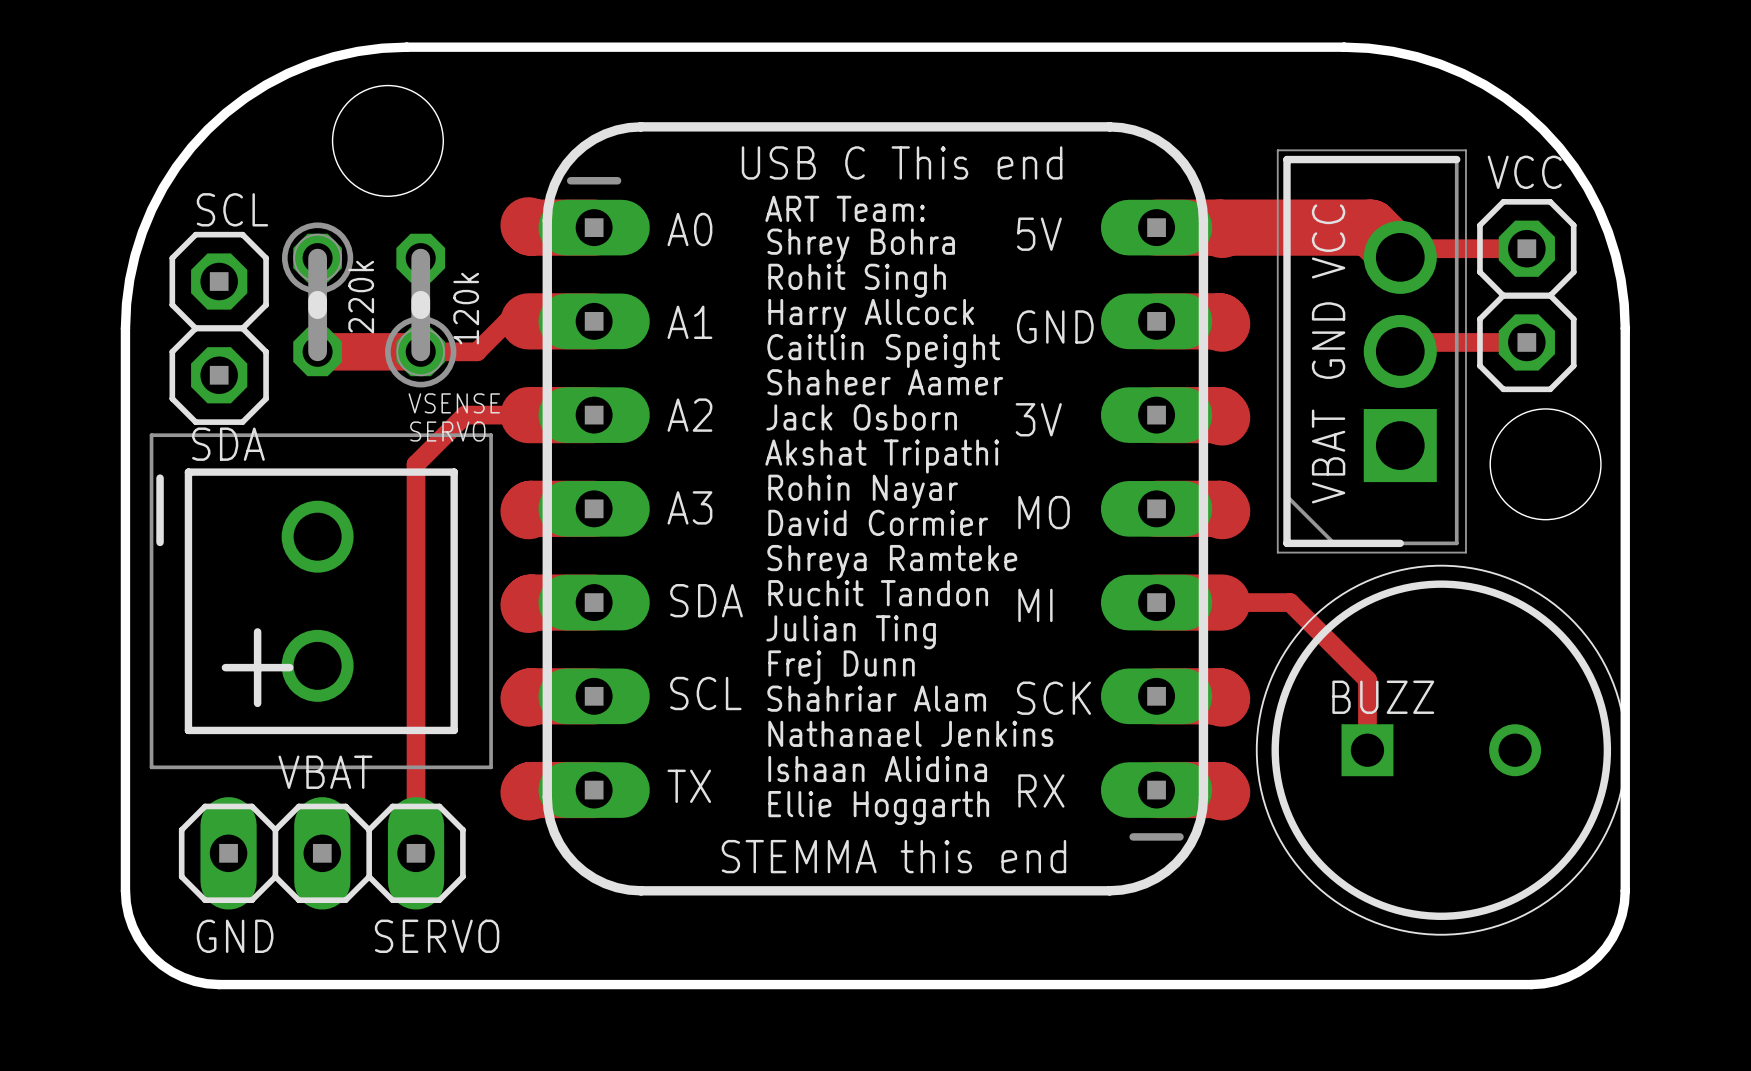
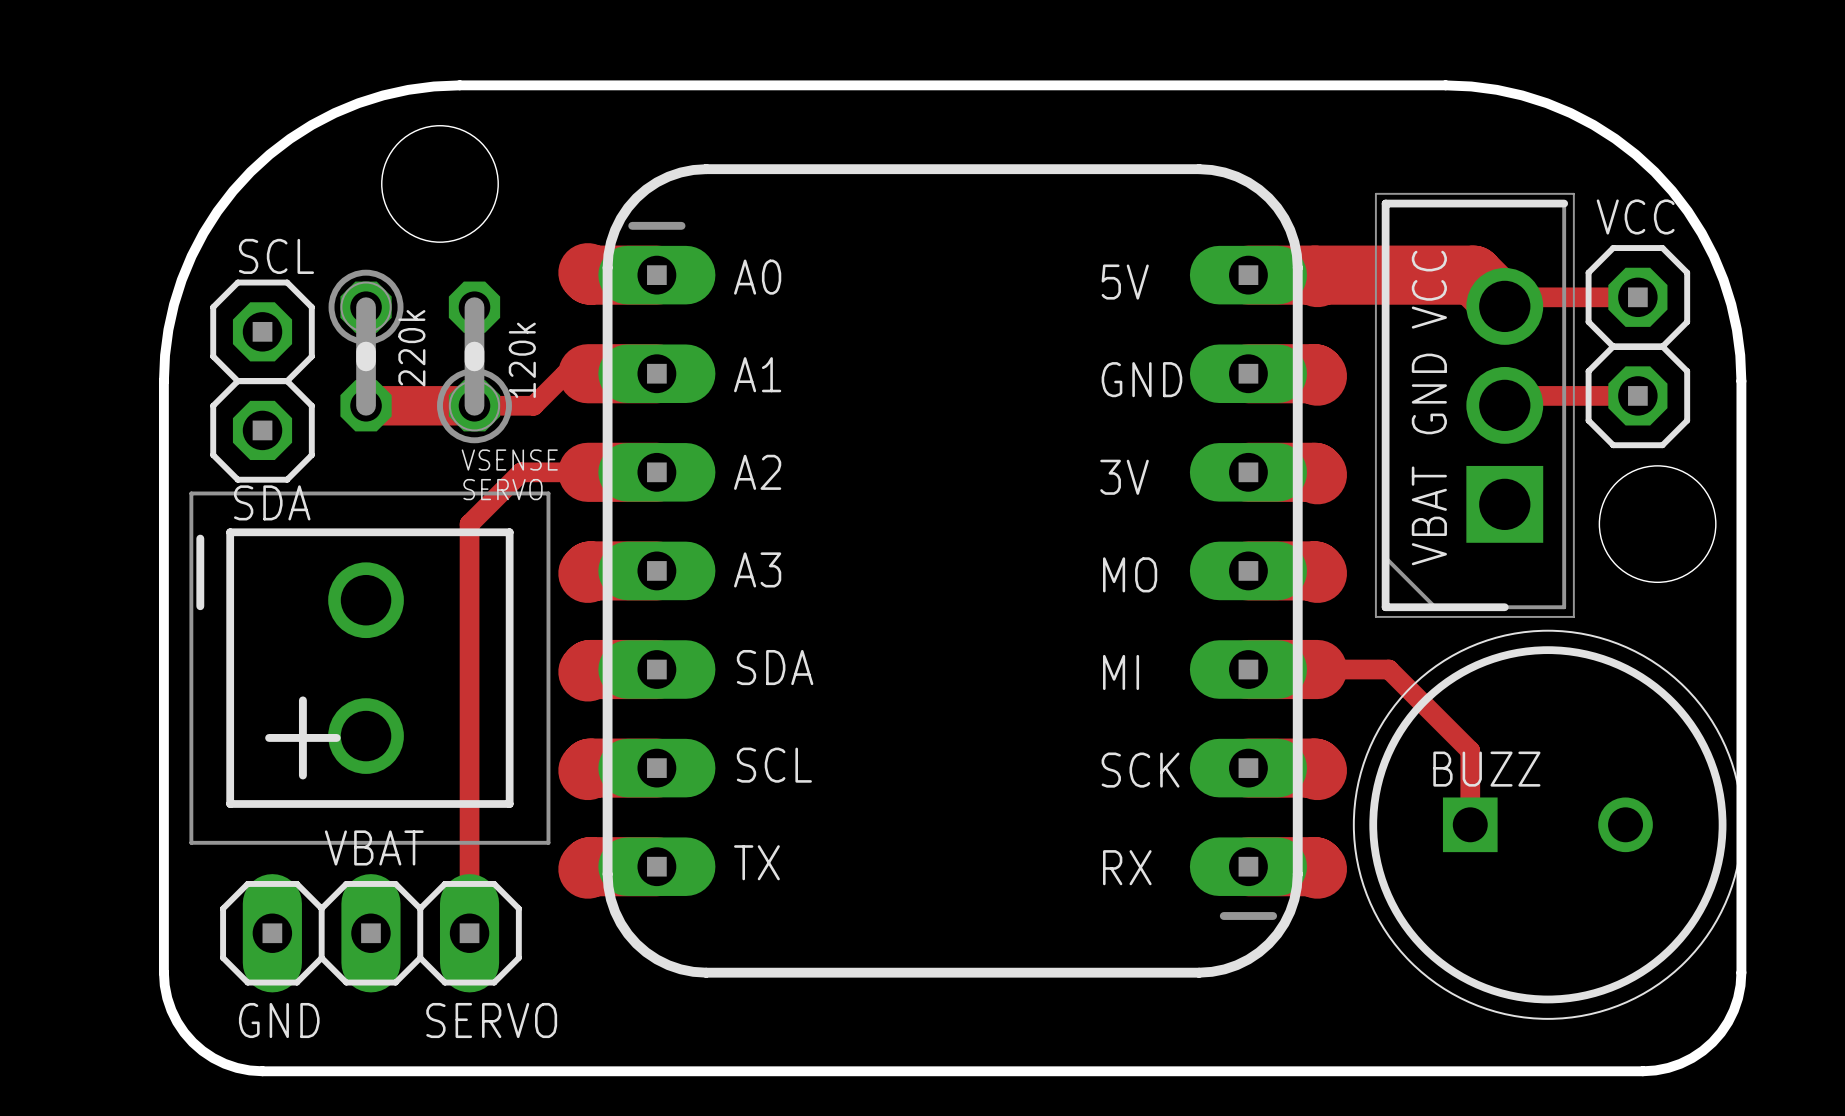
text: USB C This end (902, 162) -> none
text: ART Team: (845, 208) -> none
text: Shrey Bohra (861, 245) -> none
text: Rohit Singh (857, 280) -> none
text: Harry Allcock (871, 315) -> none
text: Caitlin Speight (883, 351) -> none
text: Shaheer Aamer (885, 382) -> none
text: Jack Osborn (861, 417) -> none
text: Akshat Tripathi (882, 456) -> none
text: Rohin Nayar (863, 491) -> none
text: David Cormier (878, 522) -> none
text: Shreya Ramteke (892, 561) -> none
text: Ruchit Tandon (878, 593) -> none
text: Julian Ting (851, 632) -> none
text: Frej Dunn (841, 667) -> none
text: Shahriar Alam (876, 698) -> none
text: Nathanael Jenkins (910, 733) -> none
text: Ishaan Alidina (877, 768) -> none
text: Ellie Hoggarth (878, 808) -> none
text: STEMMA this end (893, 856) -> none

